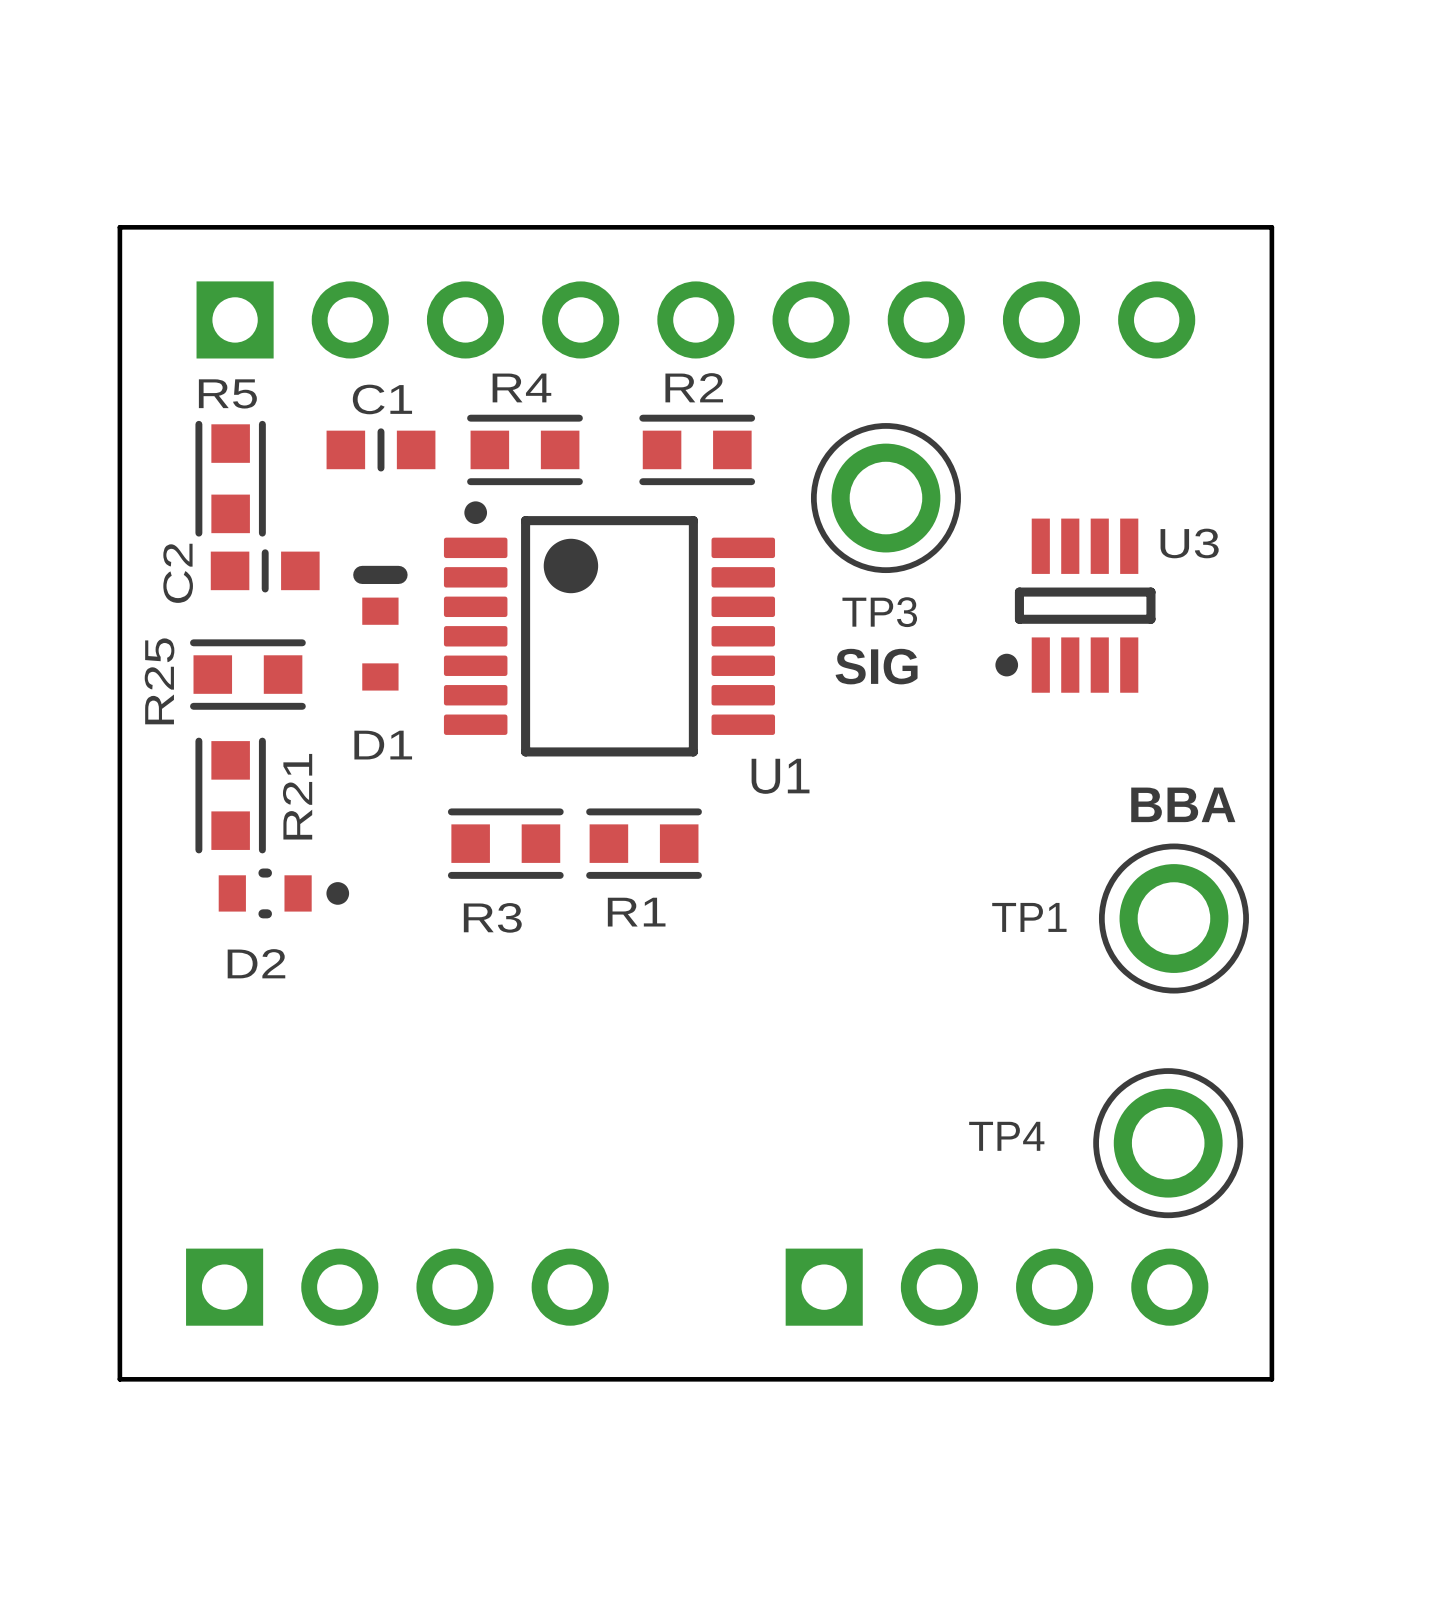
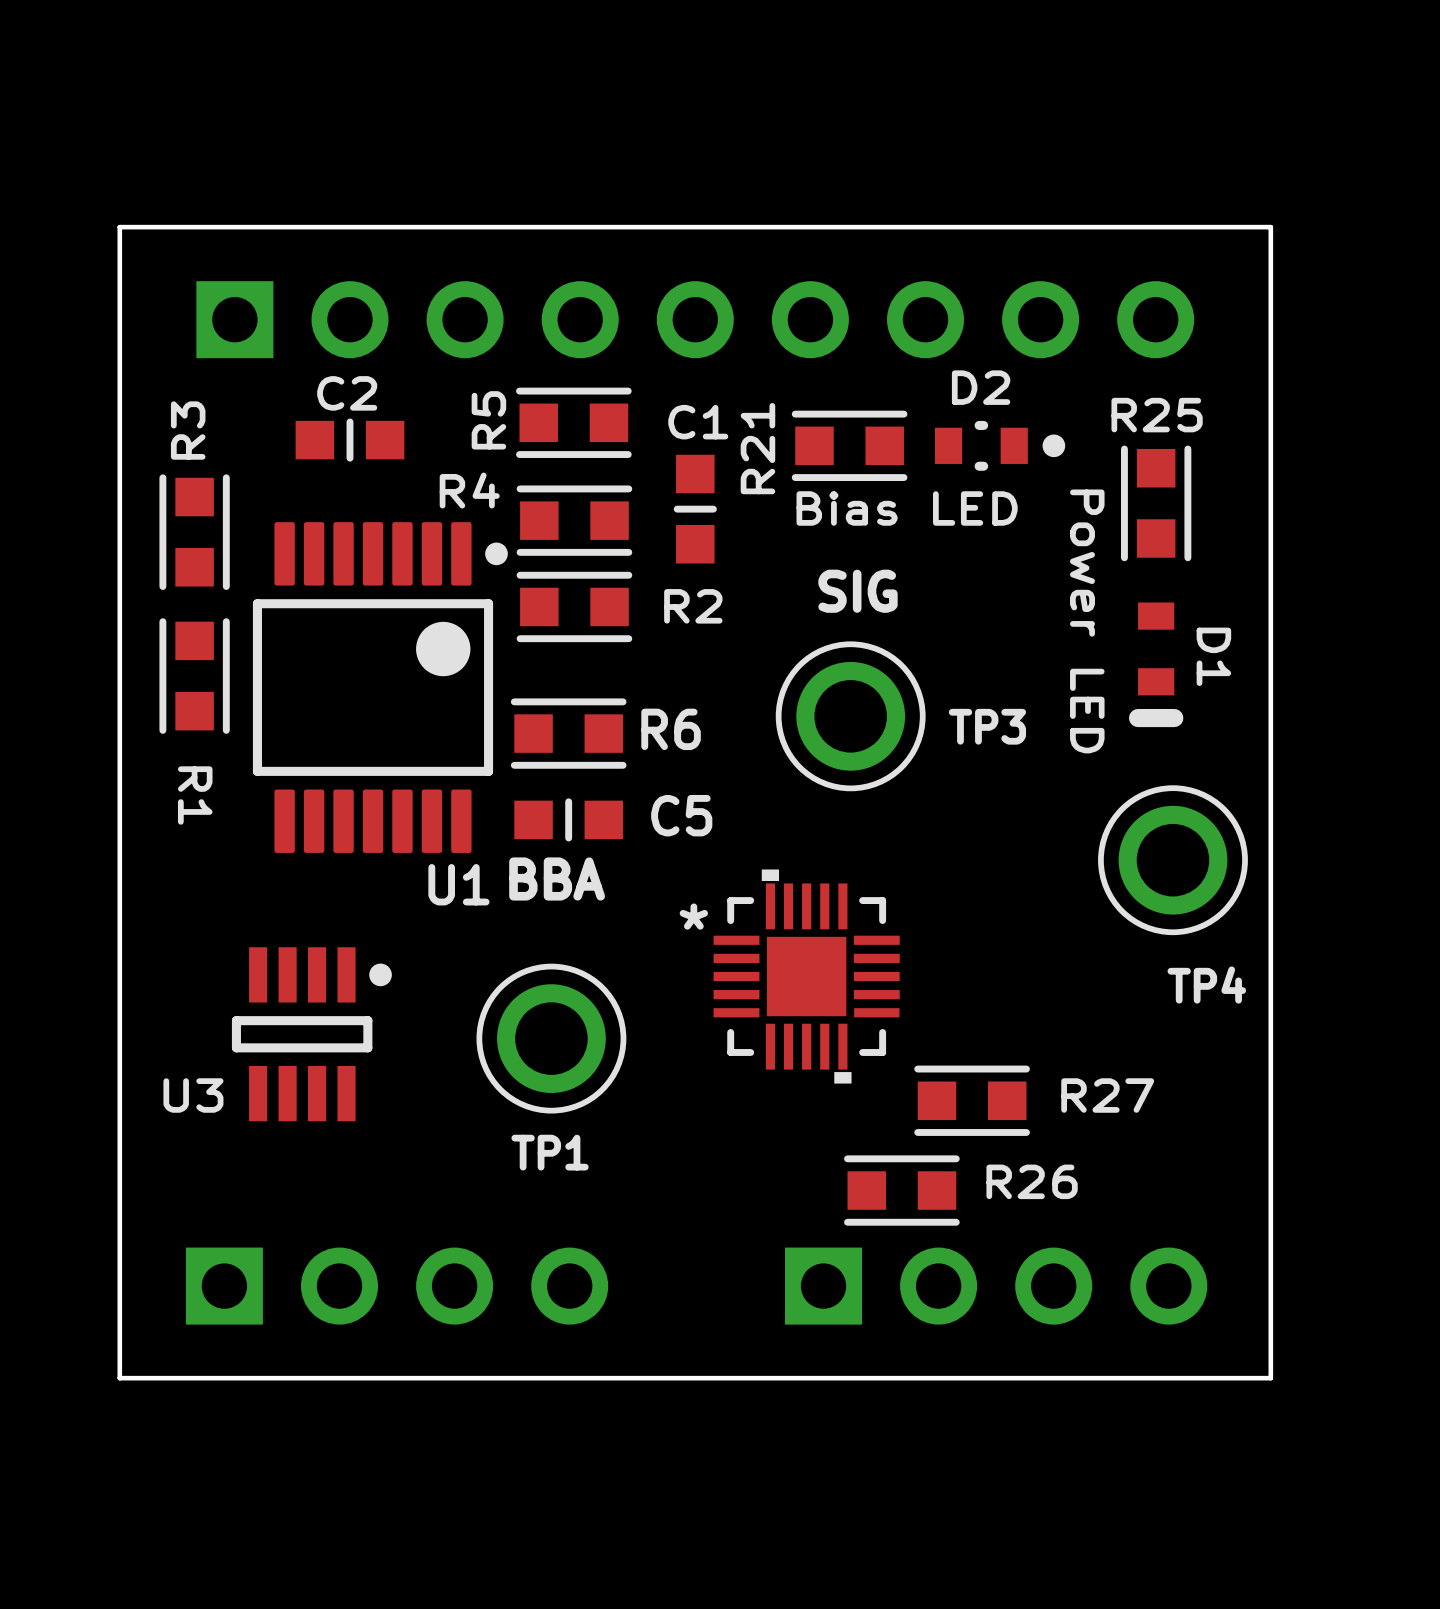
R4 name position: R4 (521, 387) -> R4 (469, 490)
R2 name position: R2 (694, 387) -> R2 (693, 606)
R5 name position: R5 (227, 393) -> R5 (488, 420)
C1 rotation: 0° (380, 449) -> 90° clockwise (695, 509)
C1 position: (380, 449) -> (695, 509)
R4 position: (524, 449) -> (574, 520)
R2 position: (697, 449) -> (574, 606)
R5 rotation: 0° (230, 478) -> 90° clockwise (573, 422)
R5 position: (230, 478) -> (573, 422)
TP3 position: (885, 498) -> (850, 716)
text: none -> Bias LED (907, 508)
C2 position: (265, 570) -> (349, 440)
C2 name rotation: 0° (178, 573) -> 90° clockwise (347, 393)
C2 name position: C2 (178, 573) -> C2 (347, 393)
U3 rotation: 0° (1075, 605) -> 180° (311, 1034)
U3 position: (1075, 605) -> (311, 1034)
text: none -> Power LED (1087, 621)
TP3 name position: TP3 (879, 612) -> TP3 (987, 726)
D1 rotation: 0° (380, 628) -> 180° (1156, 664)
D1 position: (380, 628) -> (1156, 664)
U1 rotation: 0° (609, 628) -> 90° clockwise (380, 687)
U1 position: (609, 628) -> (380, 687)
text position: SIG (876, 666) -> SIG (858, 591)
R25 rotation: 0° (247, 674) -> 90° clockwise (1156, 503)
R25 position: (247, 674) -> (1156, 503)
R6: none -> (568, 733)
D1 name position: D1 (383, 745) -> D1 (1213, 656)
U1 name position: U1 (780, 776) -> U1 (458, 884)
R21 rotation: 0° (230, 795) -> 90° clockwise (849, 445)
R21 position: (230, 795) -> (849, 445)
R21 name position: R21 (297, 796) -> R21 (757, 448)
text position: BBA (1183, 804) -> BBA (557, 878)
C5: none -> (568, 819)
R3 rotation: 0° (505, 843) -> 90° clockwise (194, 532)
R3 position: (505, 843) -> (194, 532)
R1 rotation: 0° (644, 843) -> 90° clockwise (194, 676)
R1 position: (644, 843) -> (194, 676)
D2 position: (283, 893) -> (1000, 445)
R3 name position: R3 (492, 917) -> R3 (188, 430)
TP1 name position: TP1 (1029, 917) -> TP1 (550, 1152)
TP1 position: (1173, 918) -> (551, 1038)
D2 name position: D2 (256, 963) -> D2 (981, 387)
part: none -> (806, 976)
R27: none -> (972, 1100)
TP4 name position: TP4 (1006, 1136) -> TP4 (1206, 985)
TP4 position: (1168, 1143) -> (1172, 860)
R26: none -> (901, 1190)

